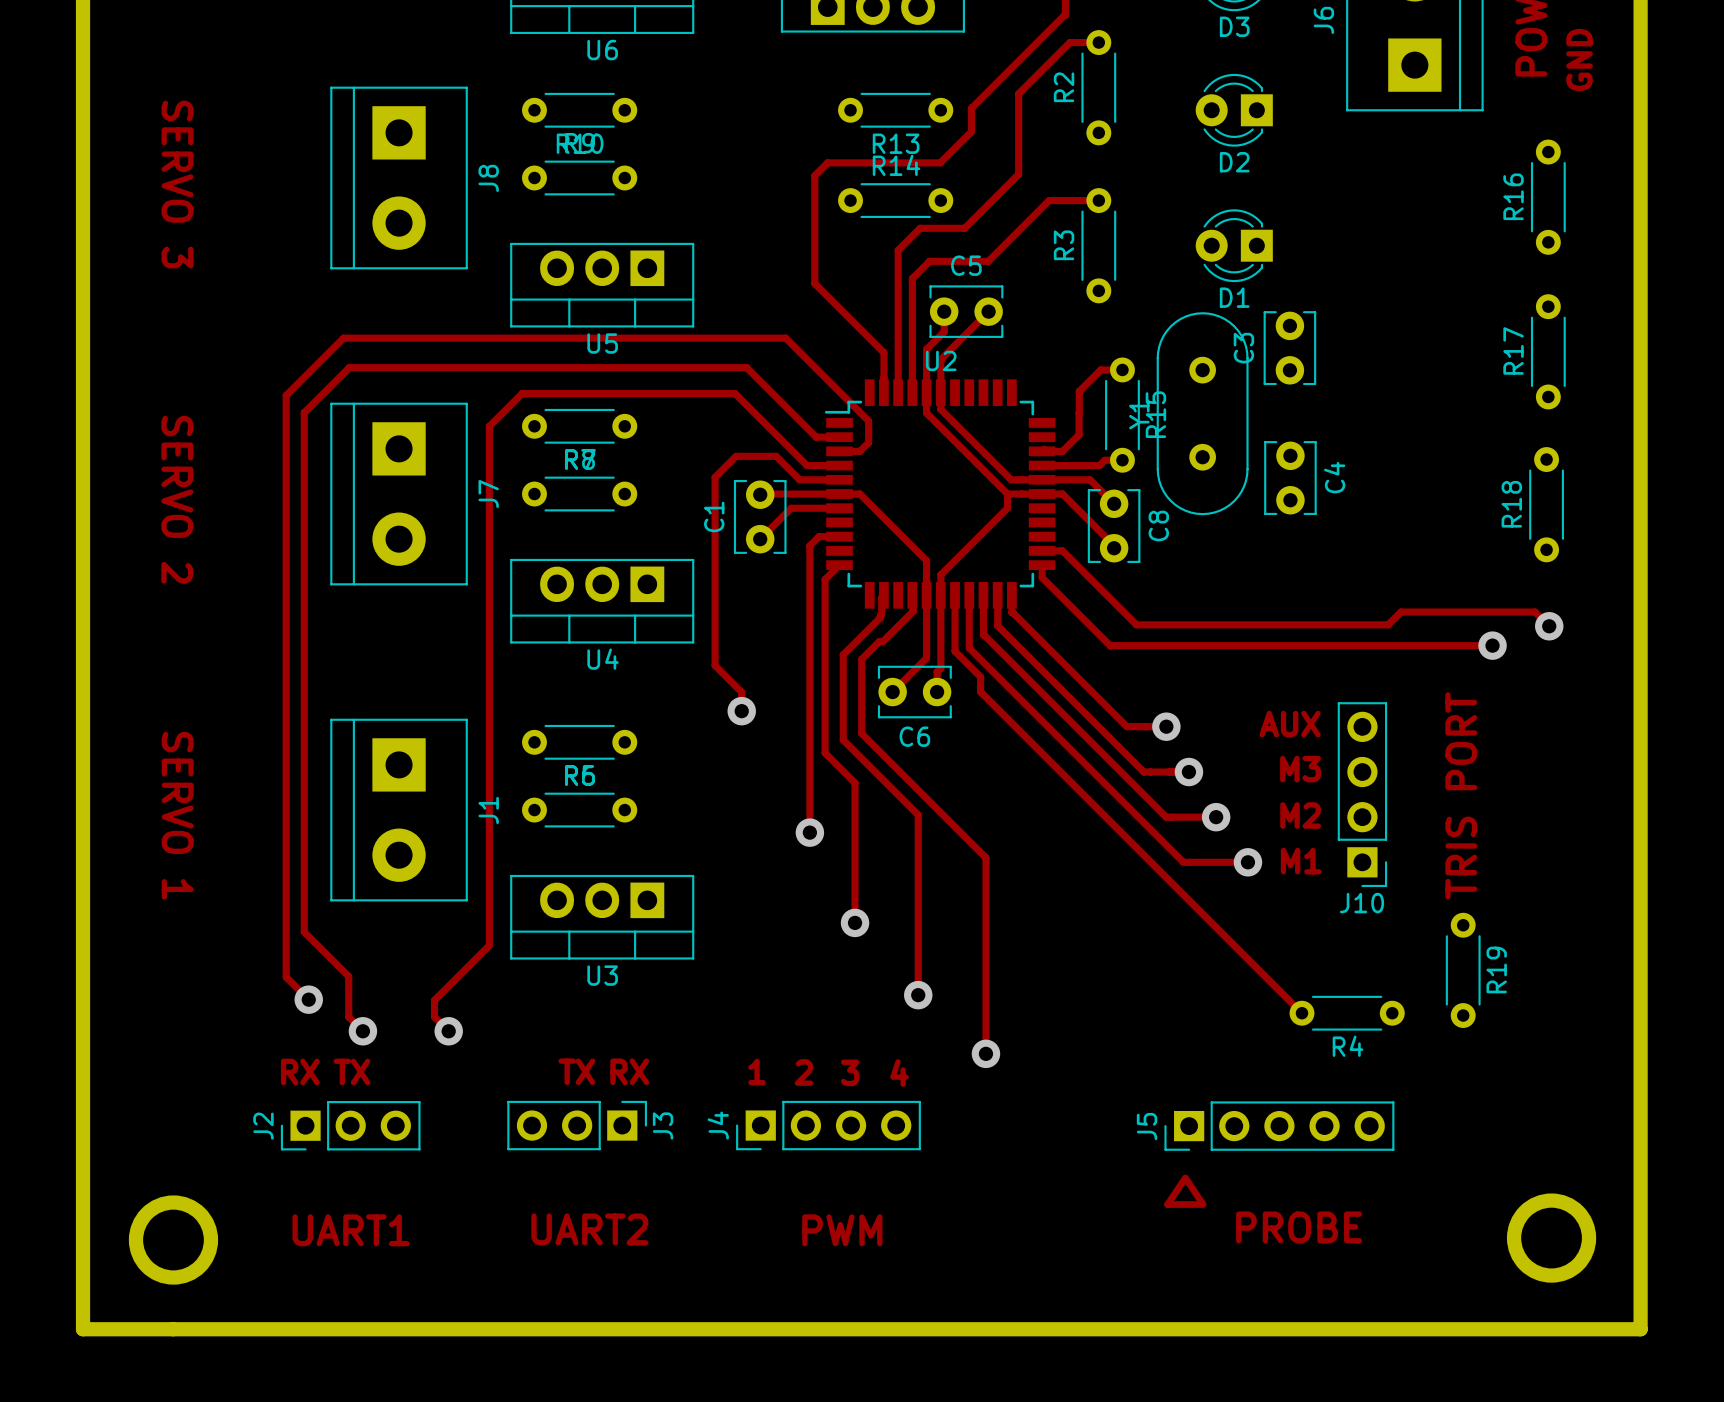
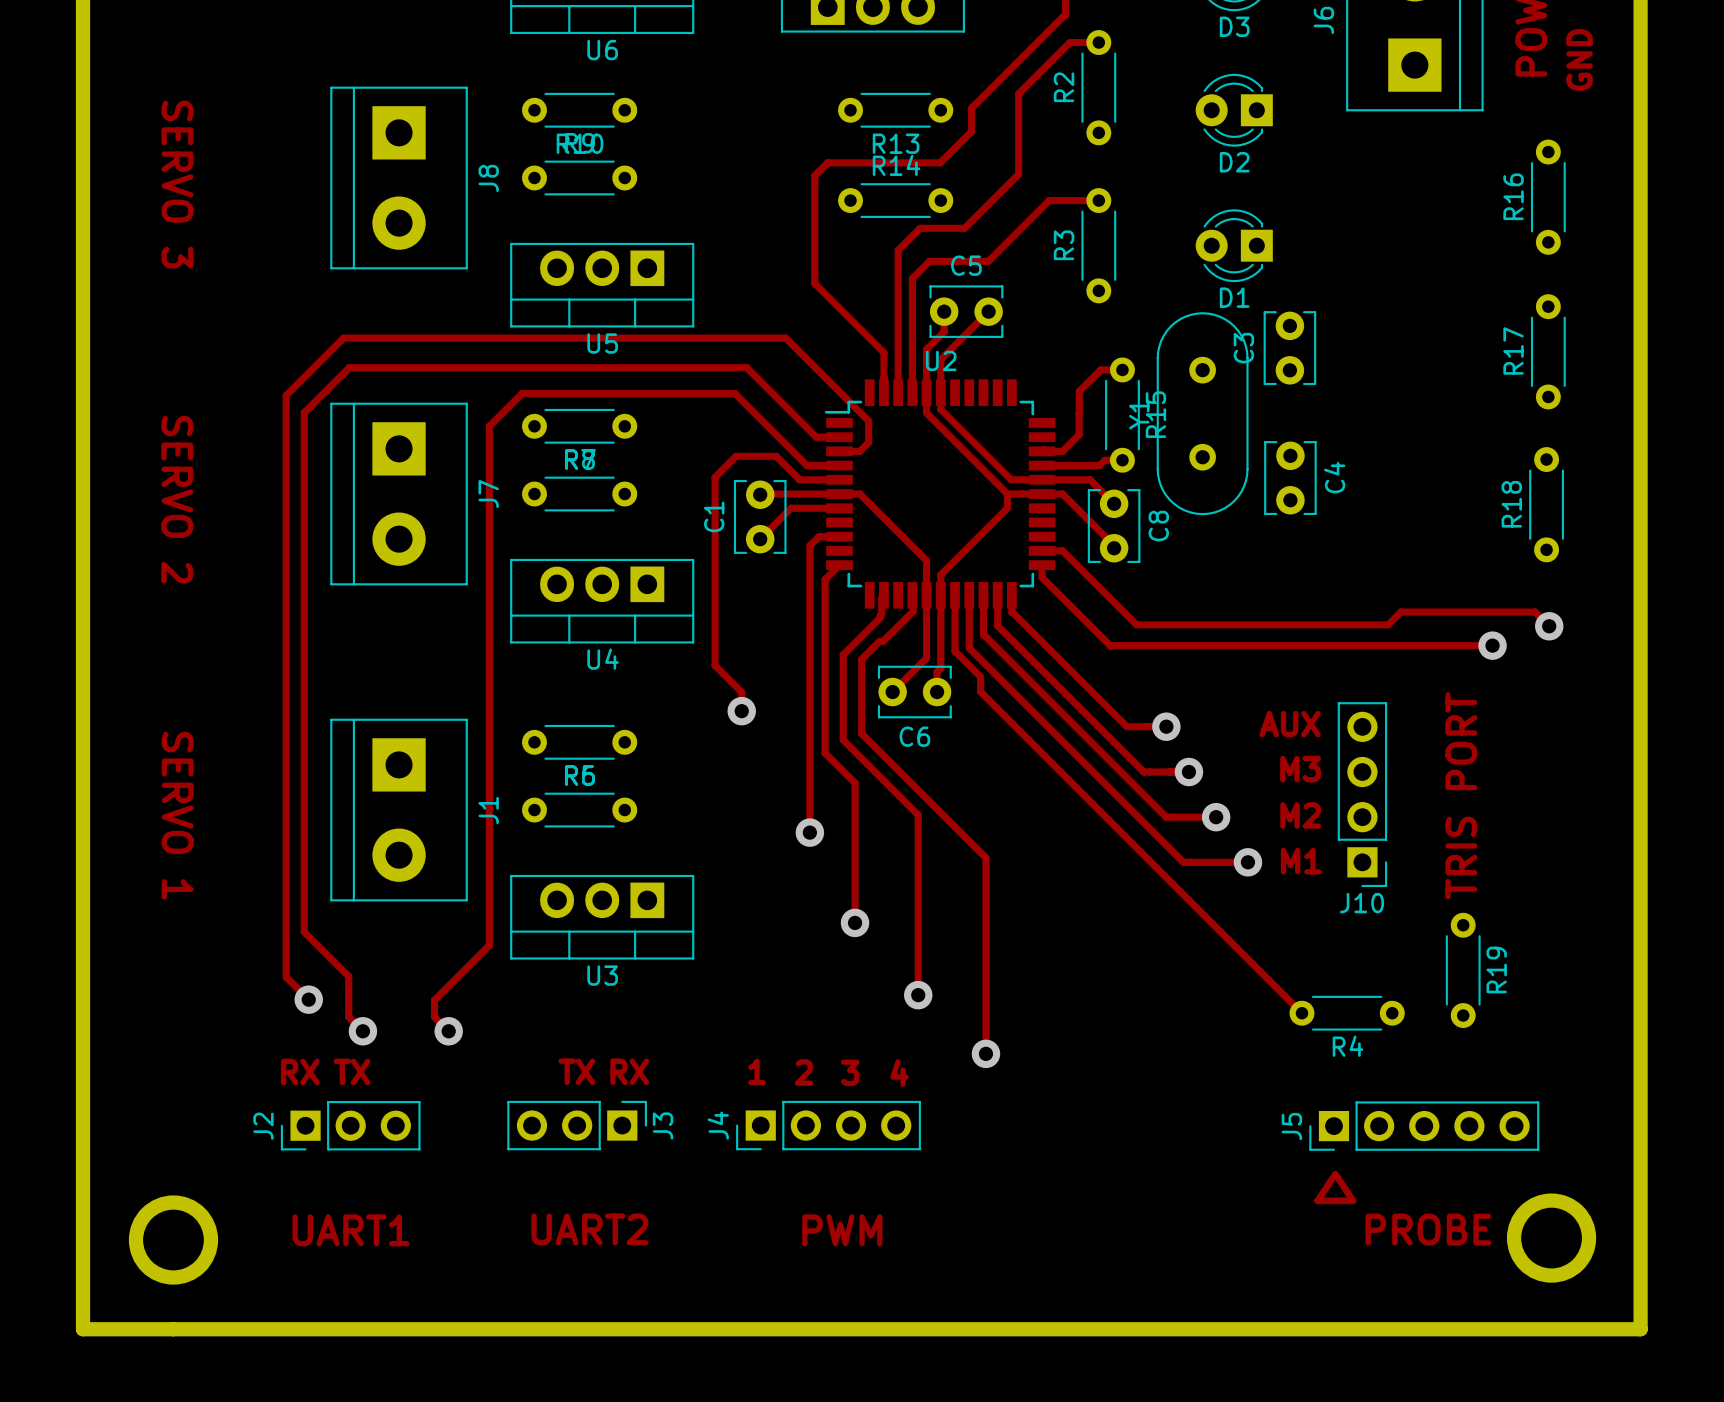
J5 position: (1279, 1126) -> (1424, 1126)
text position: Δ (1185, 1191) -> Δ (1335, 1187)
text position: PROBE (1299, 1227) -> PROBE (1428, 1229)

